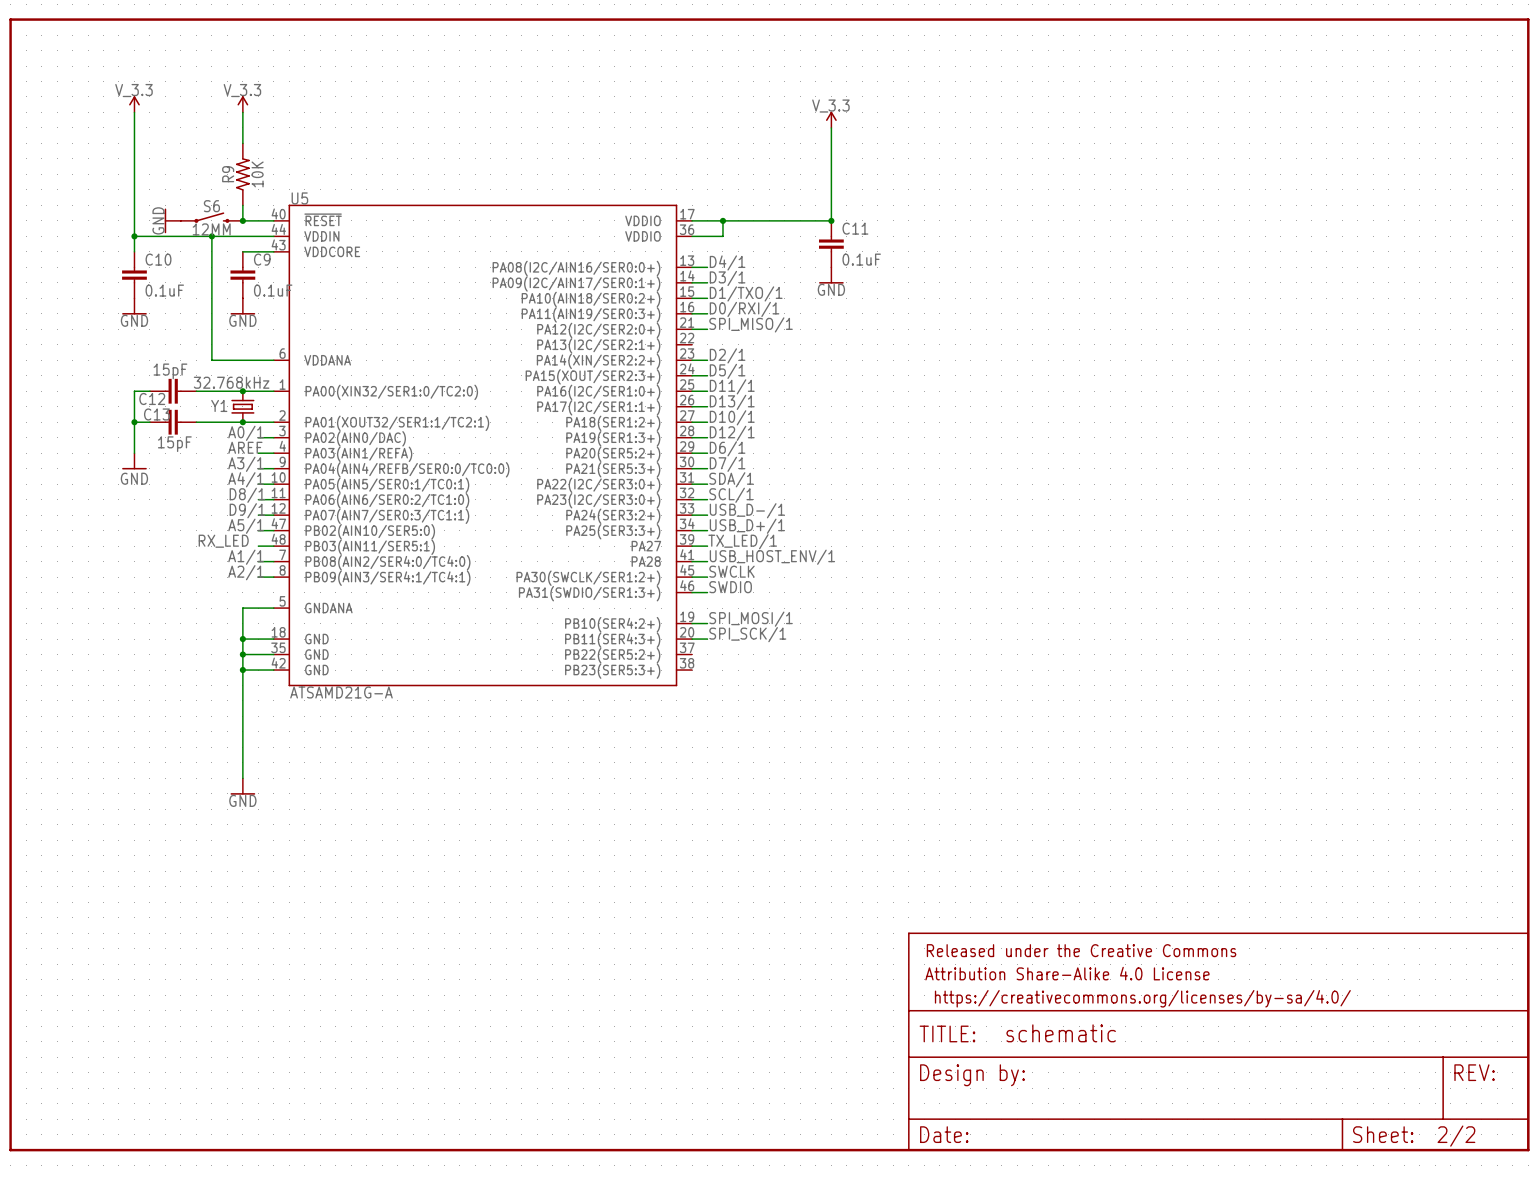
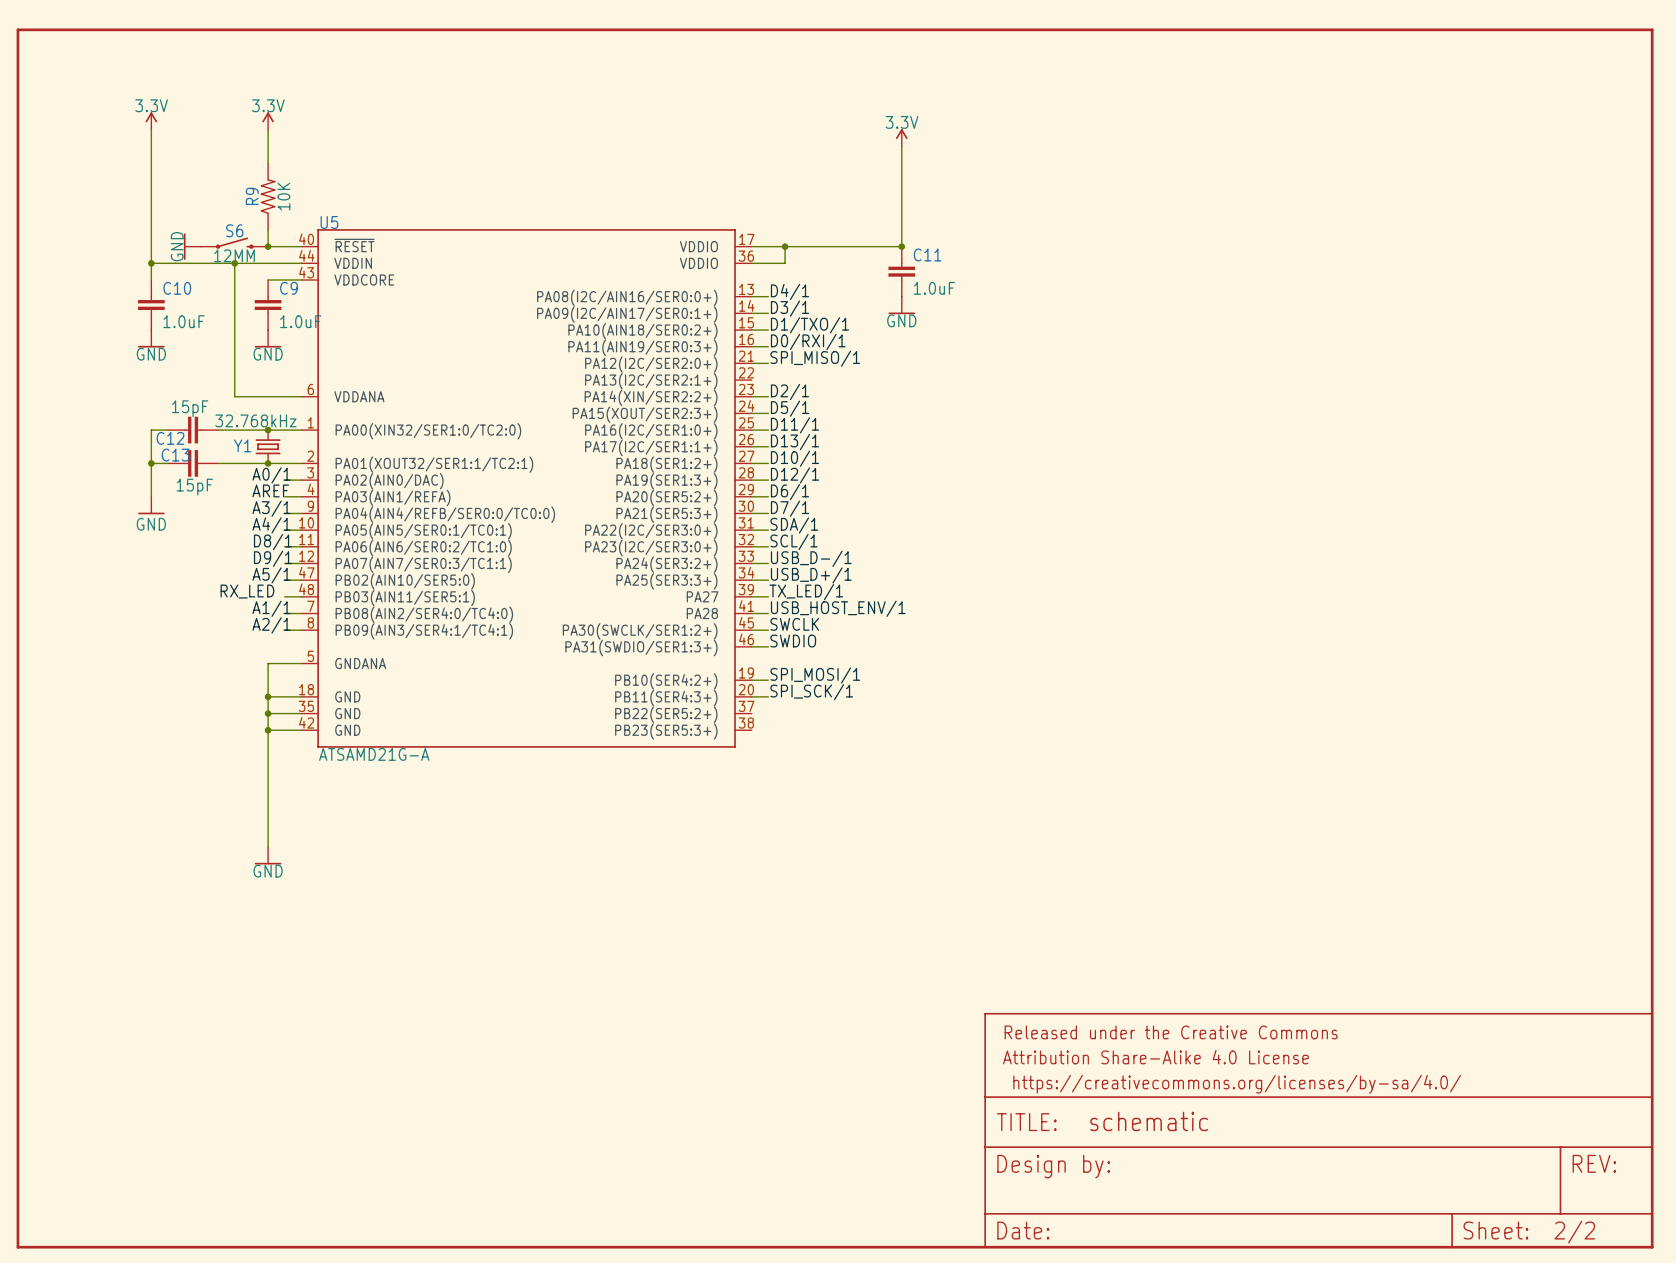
power symbol: V_3.3 (134, 104) -> 3.3V (151, 121)
power symbol: V_3.3 (242, 104) -> 3.3V (268, 121)
power symbol: V_3.3 (831, 119) -> 3.3V (901, 137)
C11 value: 0.1uF (861, 259) -> 1.0uF (934, 288)
C10 value: 0.1uF (164, 290) -> 1.0uF (183, 321)
C9 value: 0.1uF (273, 290) -> 1.0uF (300, 321)

